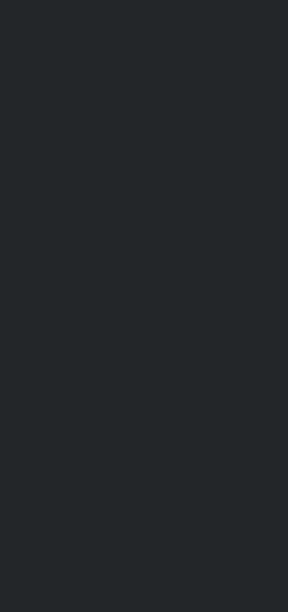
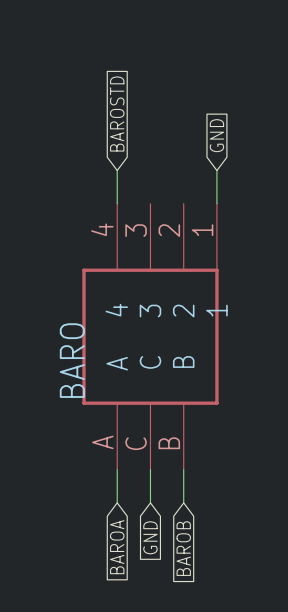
global label: none -> BAROSTD (117, 113)
global label: none -> GND (216, 135)
wire: none -> (117, 170) (117, 203)
wire: none -> (216, 170) (216, 203)
BARO: none -> (150, 336)
wire: none -> (117, 469) (117, 502)
wire: none -> (150, 469) (150, 502)
wire: none -> (183, 469) (183, 502)
global label: none -> GND (150, 537)
global label: none -> BAROA (117, 547)
global label: none -> BAROB (183, 548)

